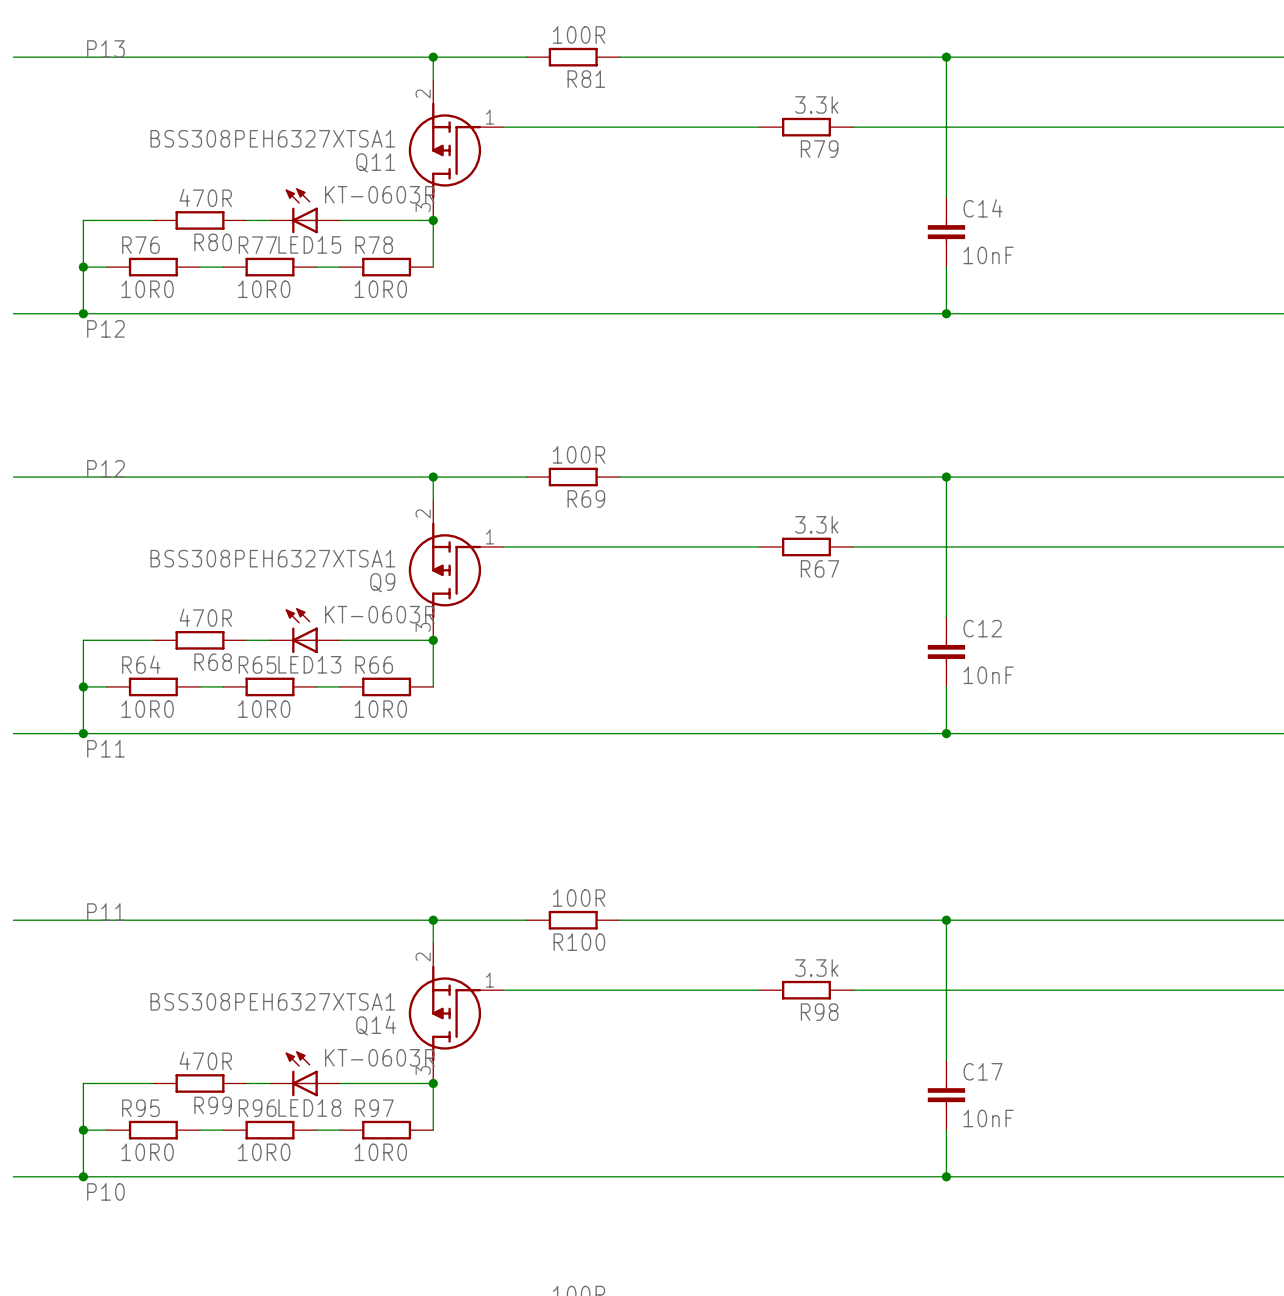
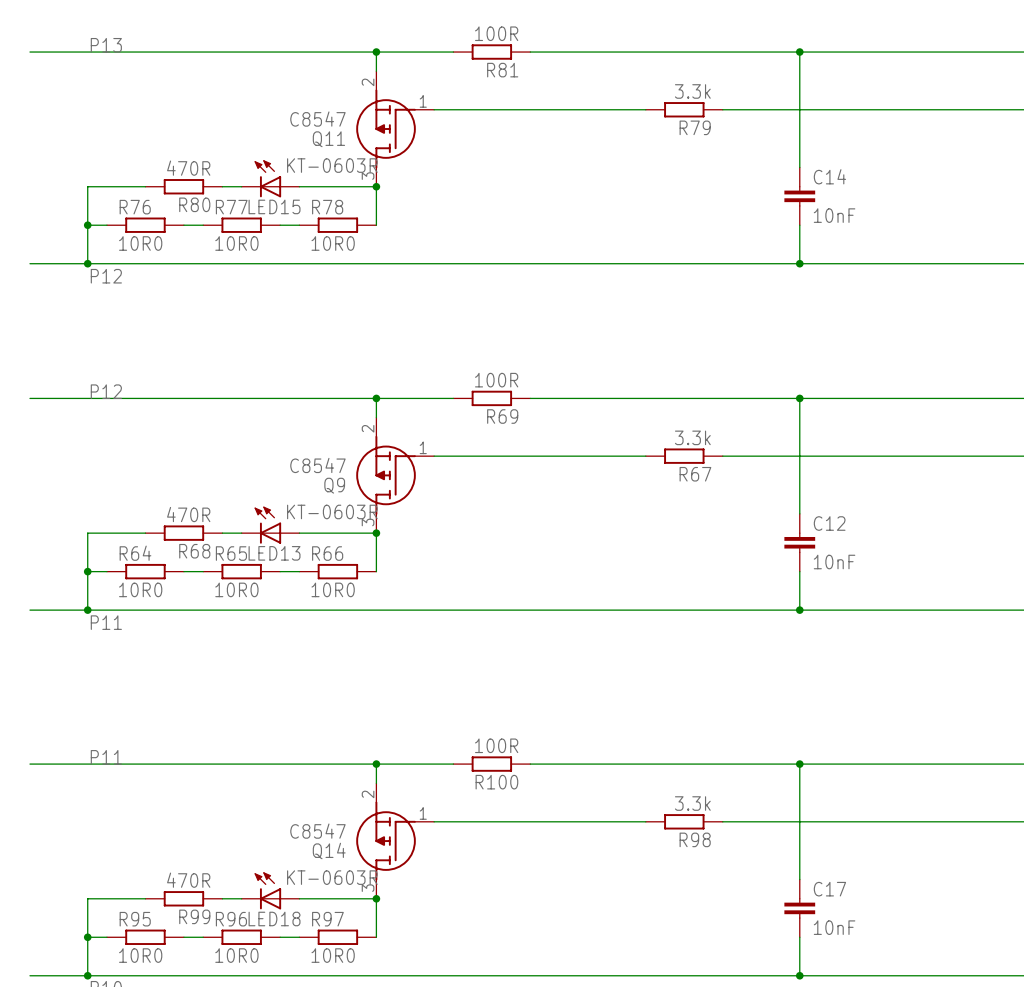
Q11 value: BSS308PEH6327XTSA1 (272, 138) -> C8547 (317, 119)
Q9 value: BSS308PEH6327XTSA1 (272, 558) -> C8547 (317, 465)
Q14 value: BSS308PEH6327XTSA1 (272, 1001) -> C8547 (317, 831)

